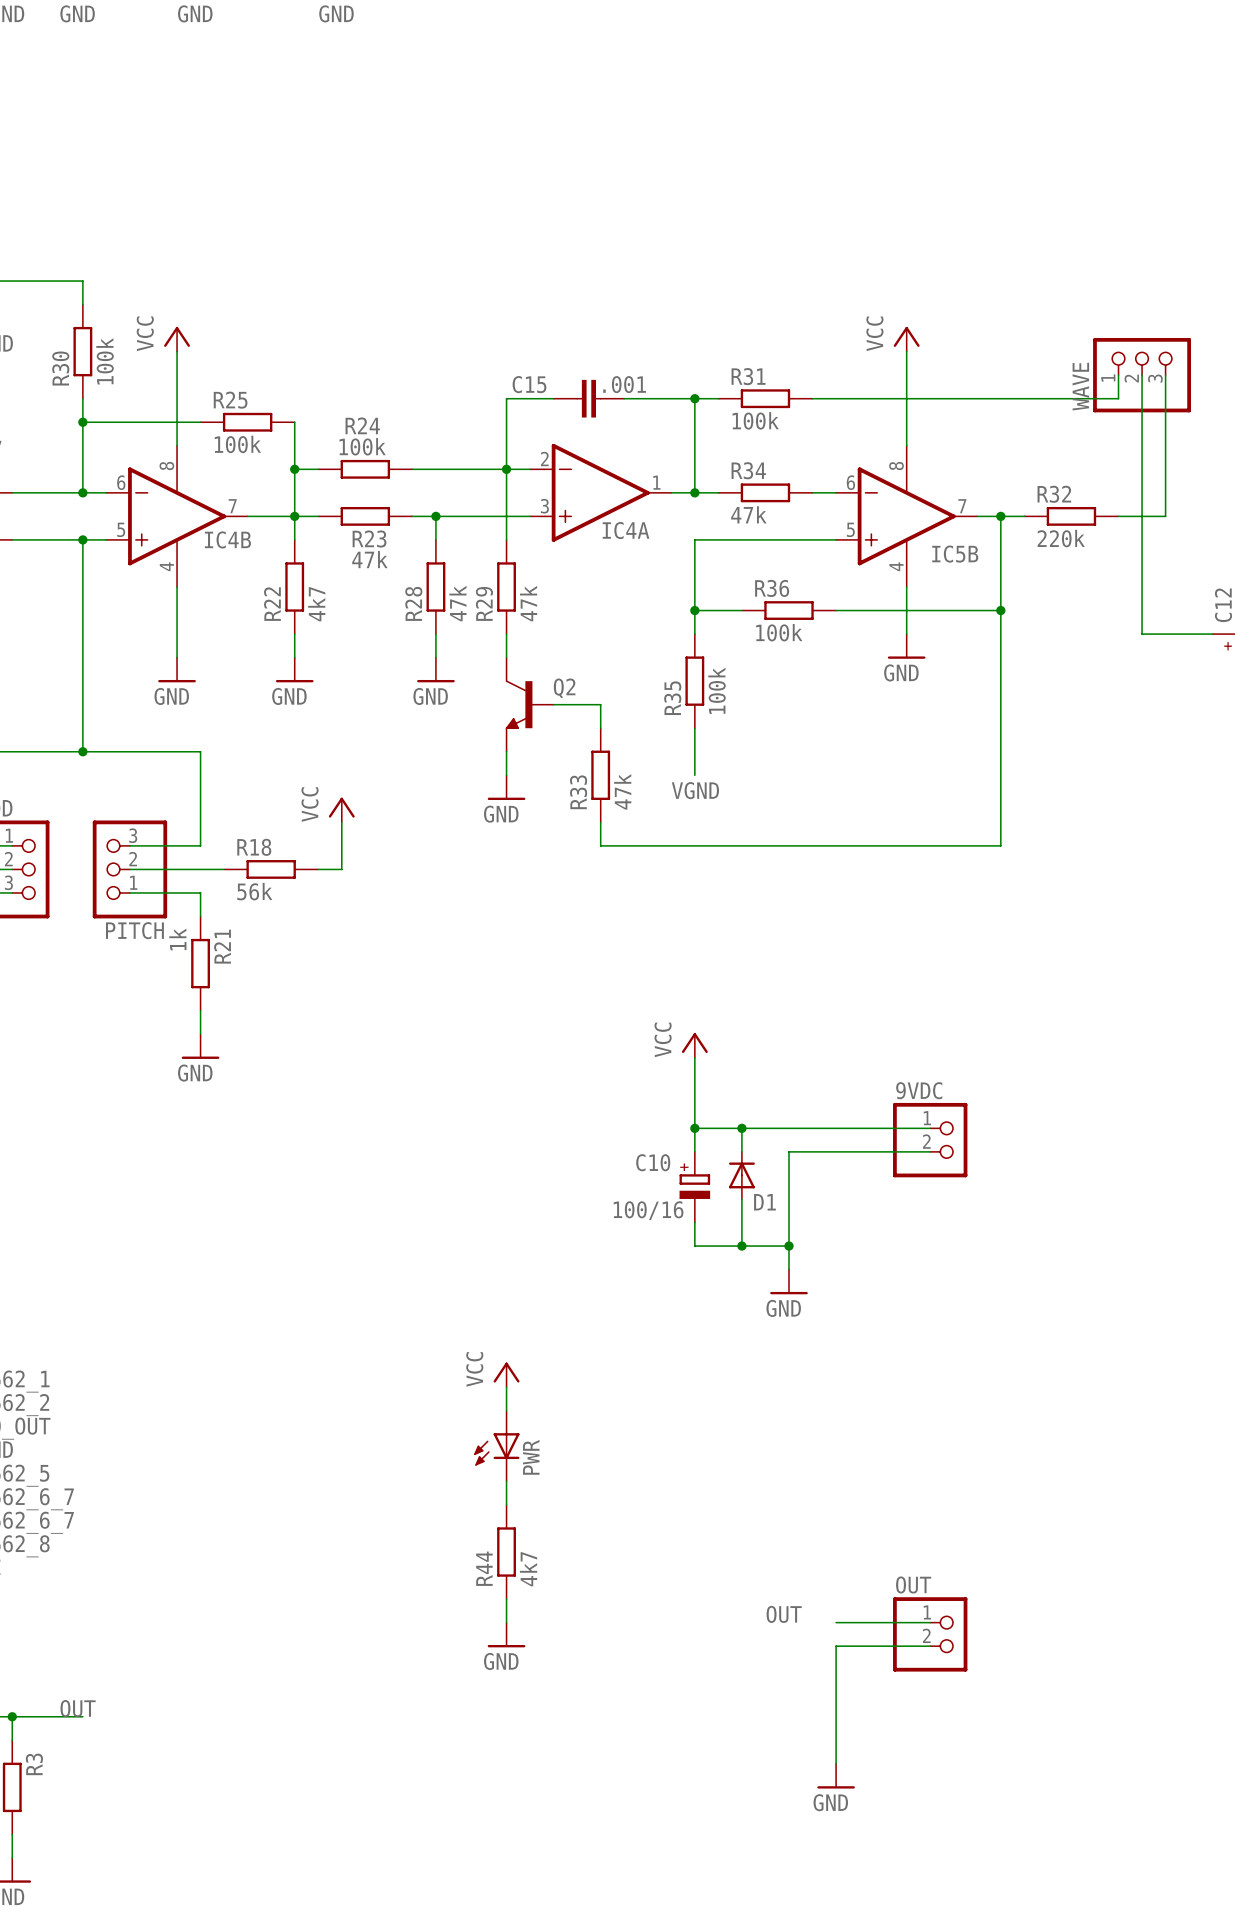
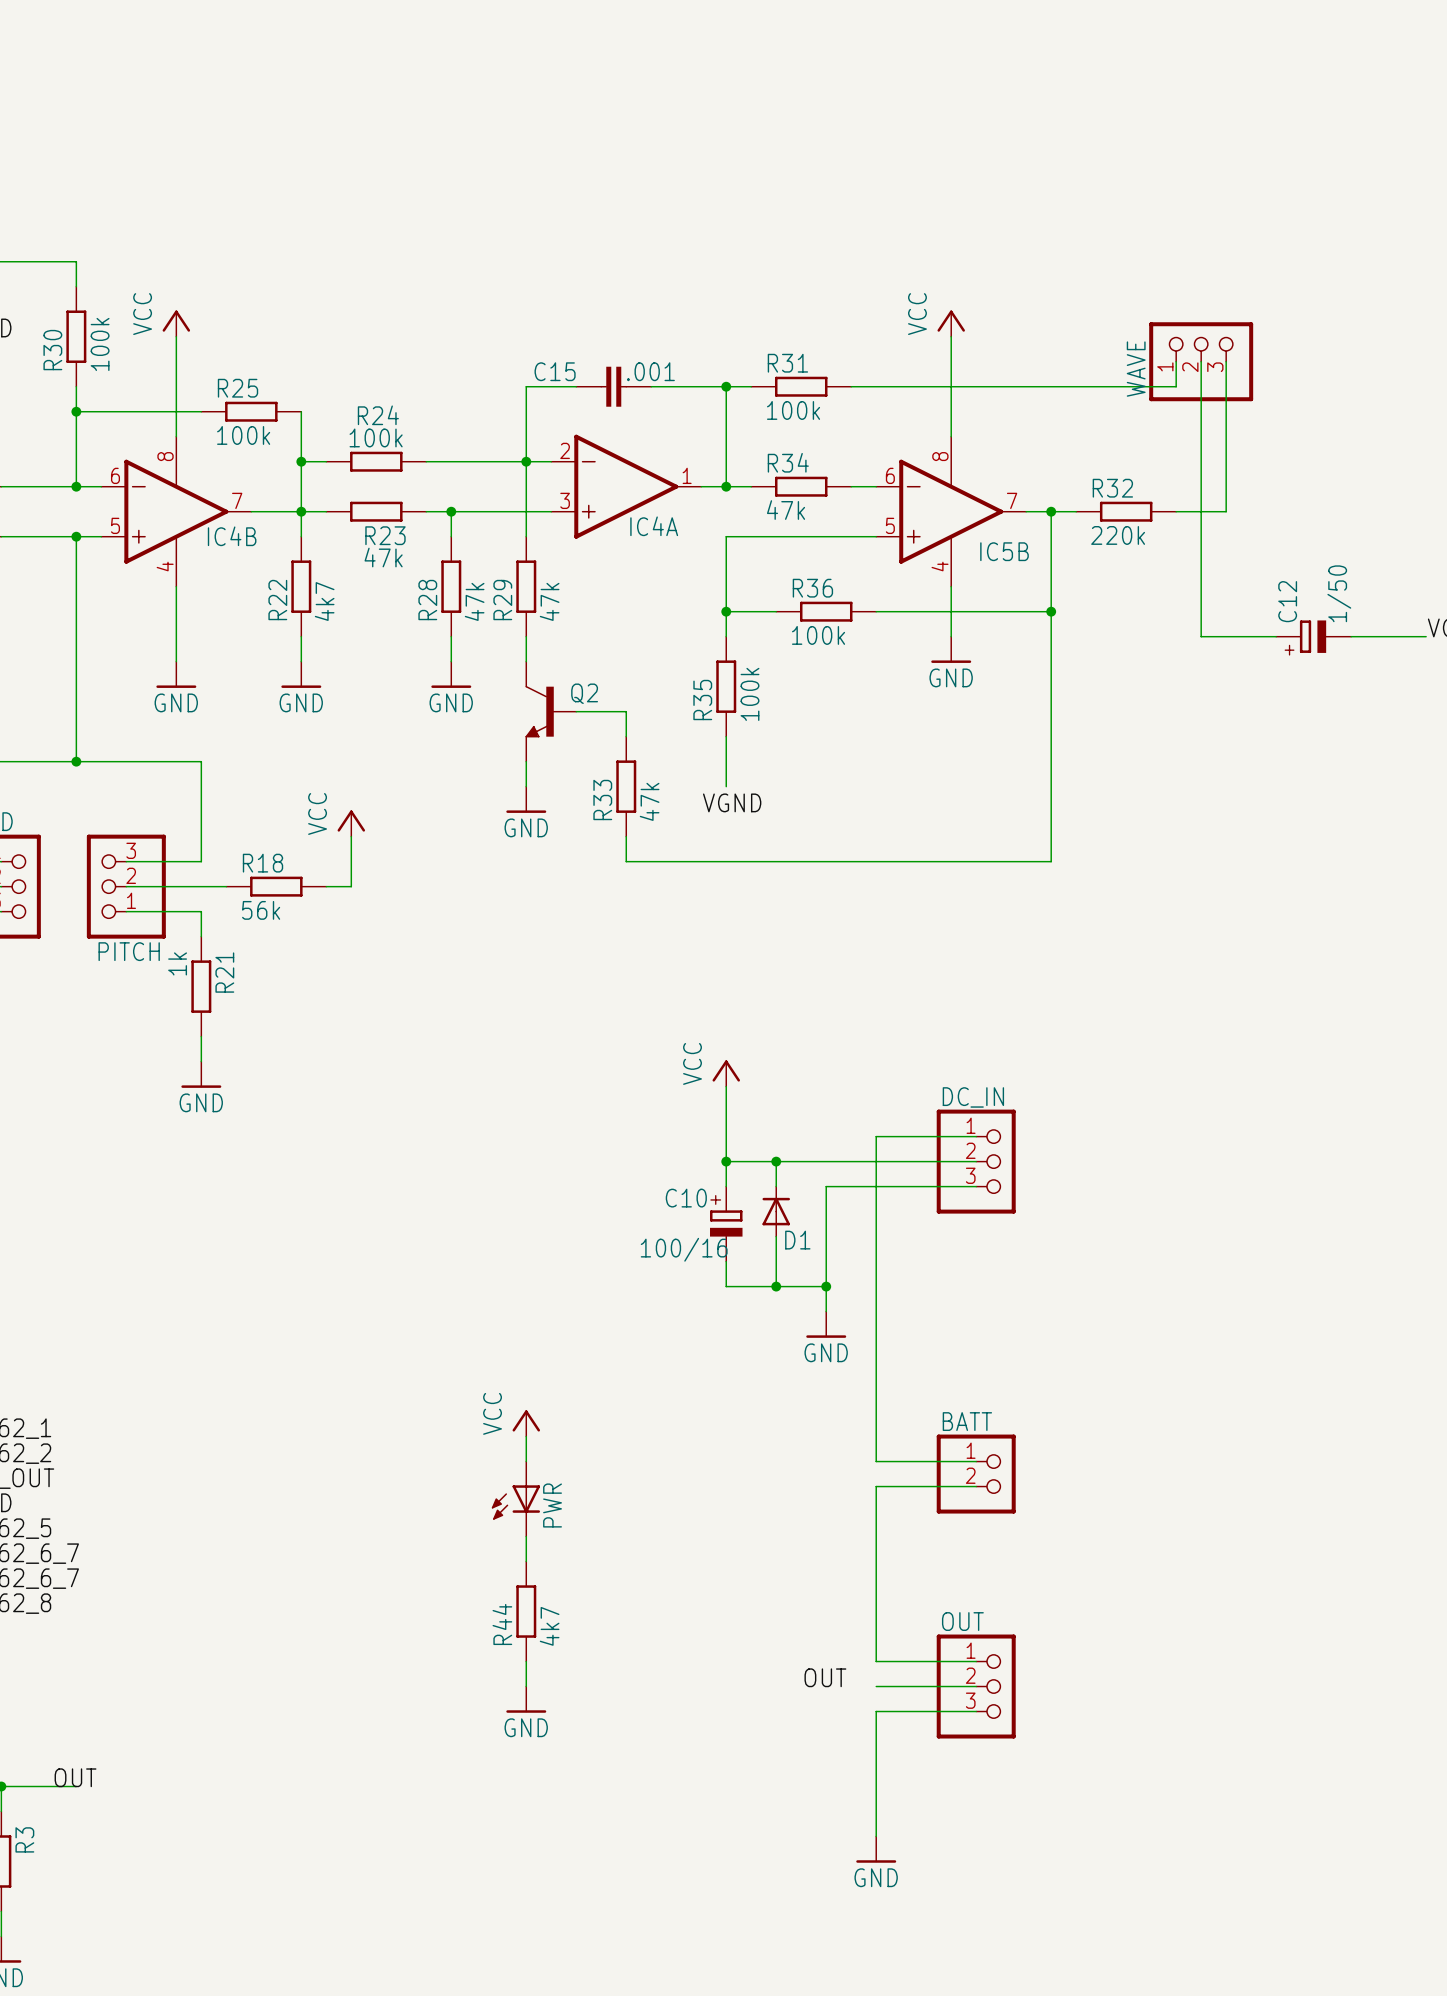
wire: none -> (976, 1136) (876, 1136) (876, 1461) (976, 1461)
DC_IN: none -> (976, 1161)
9VDC: (930, 1140) -> none
BATT: none -> (976, 1474)
wire: none -> (976, 1486) (876, 1486) (876, 1661) (976, 1661)
OUT: none -> (976, 1686)
OUT: (930, 1634) -> none

